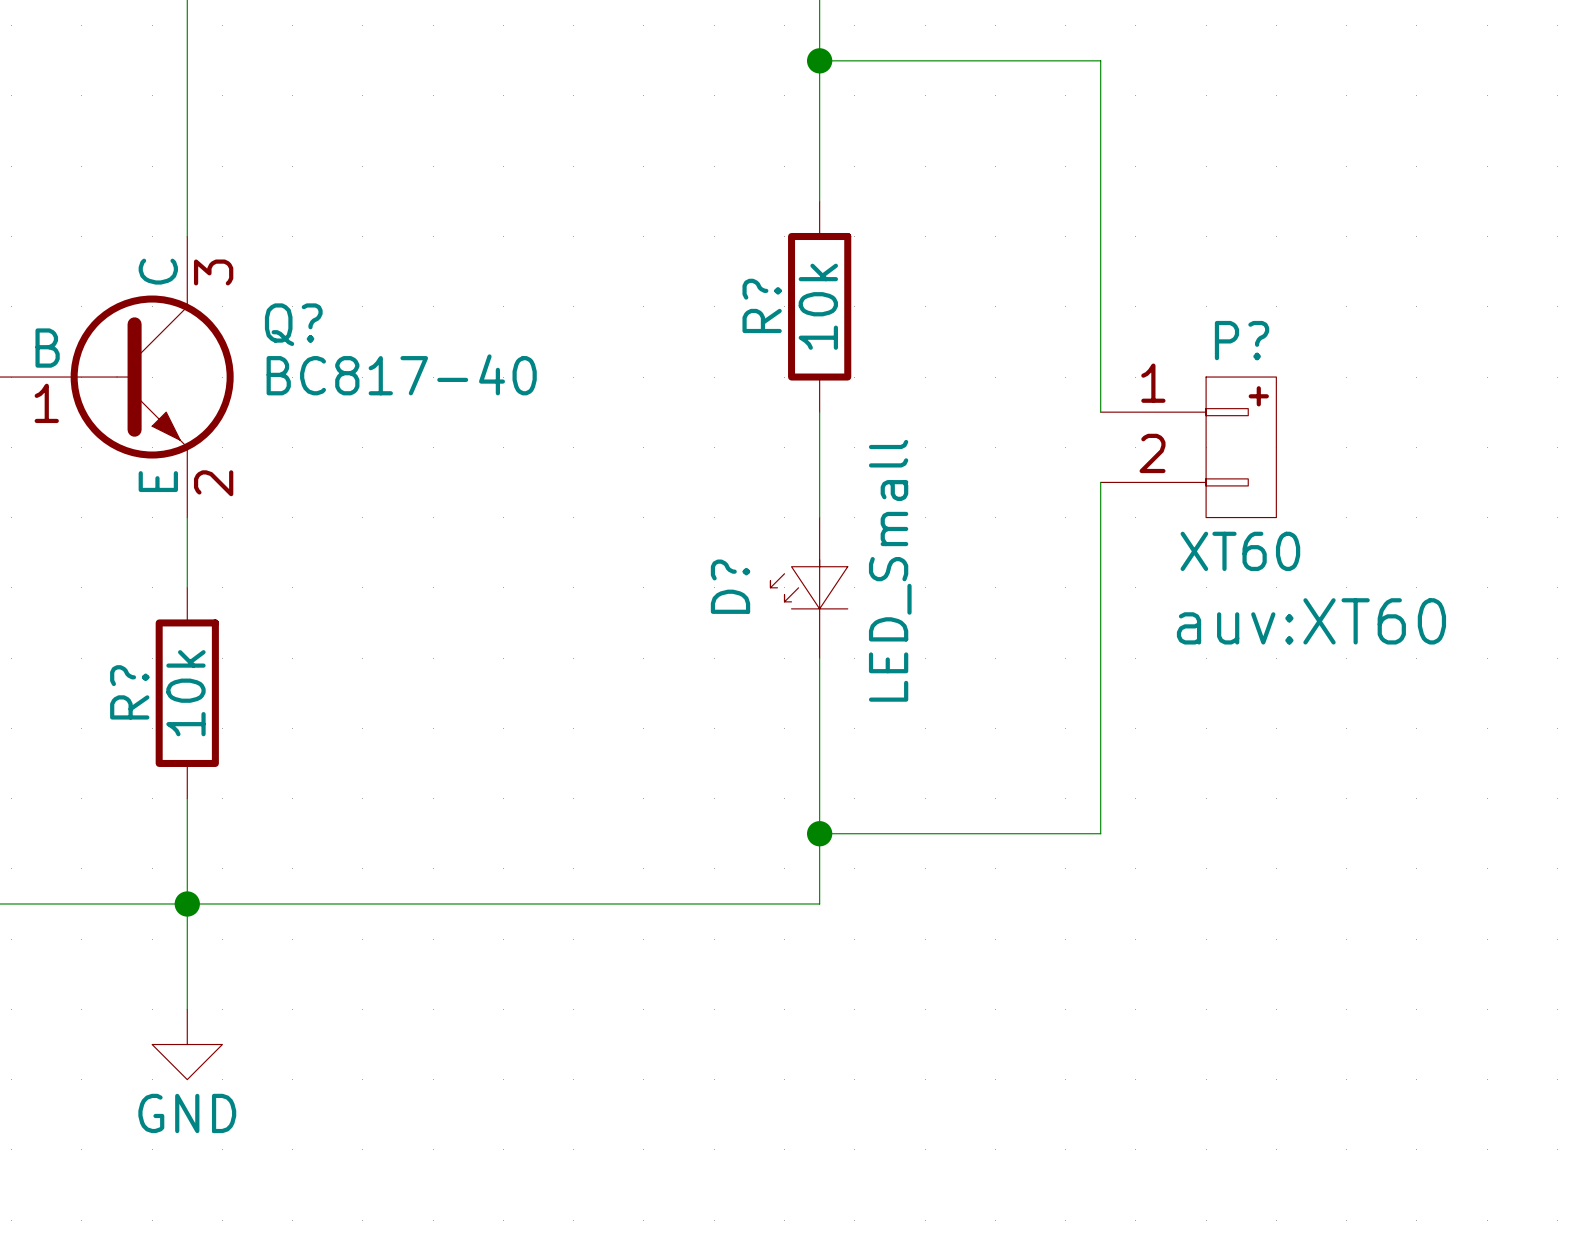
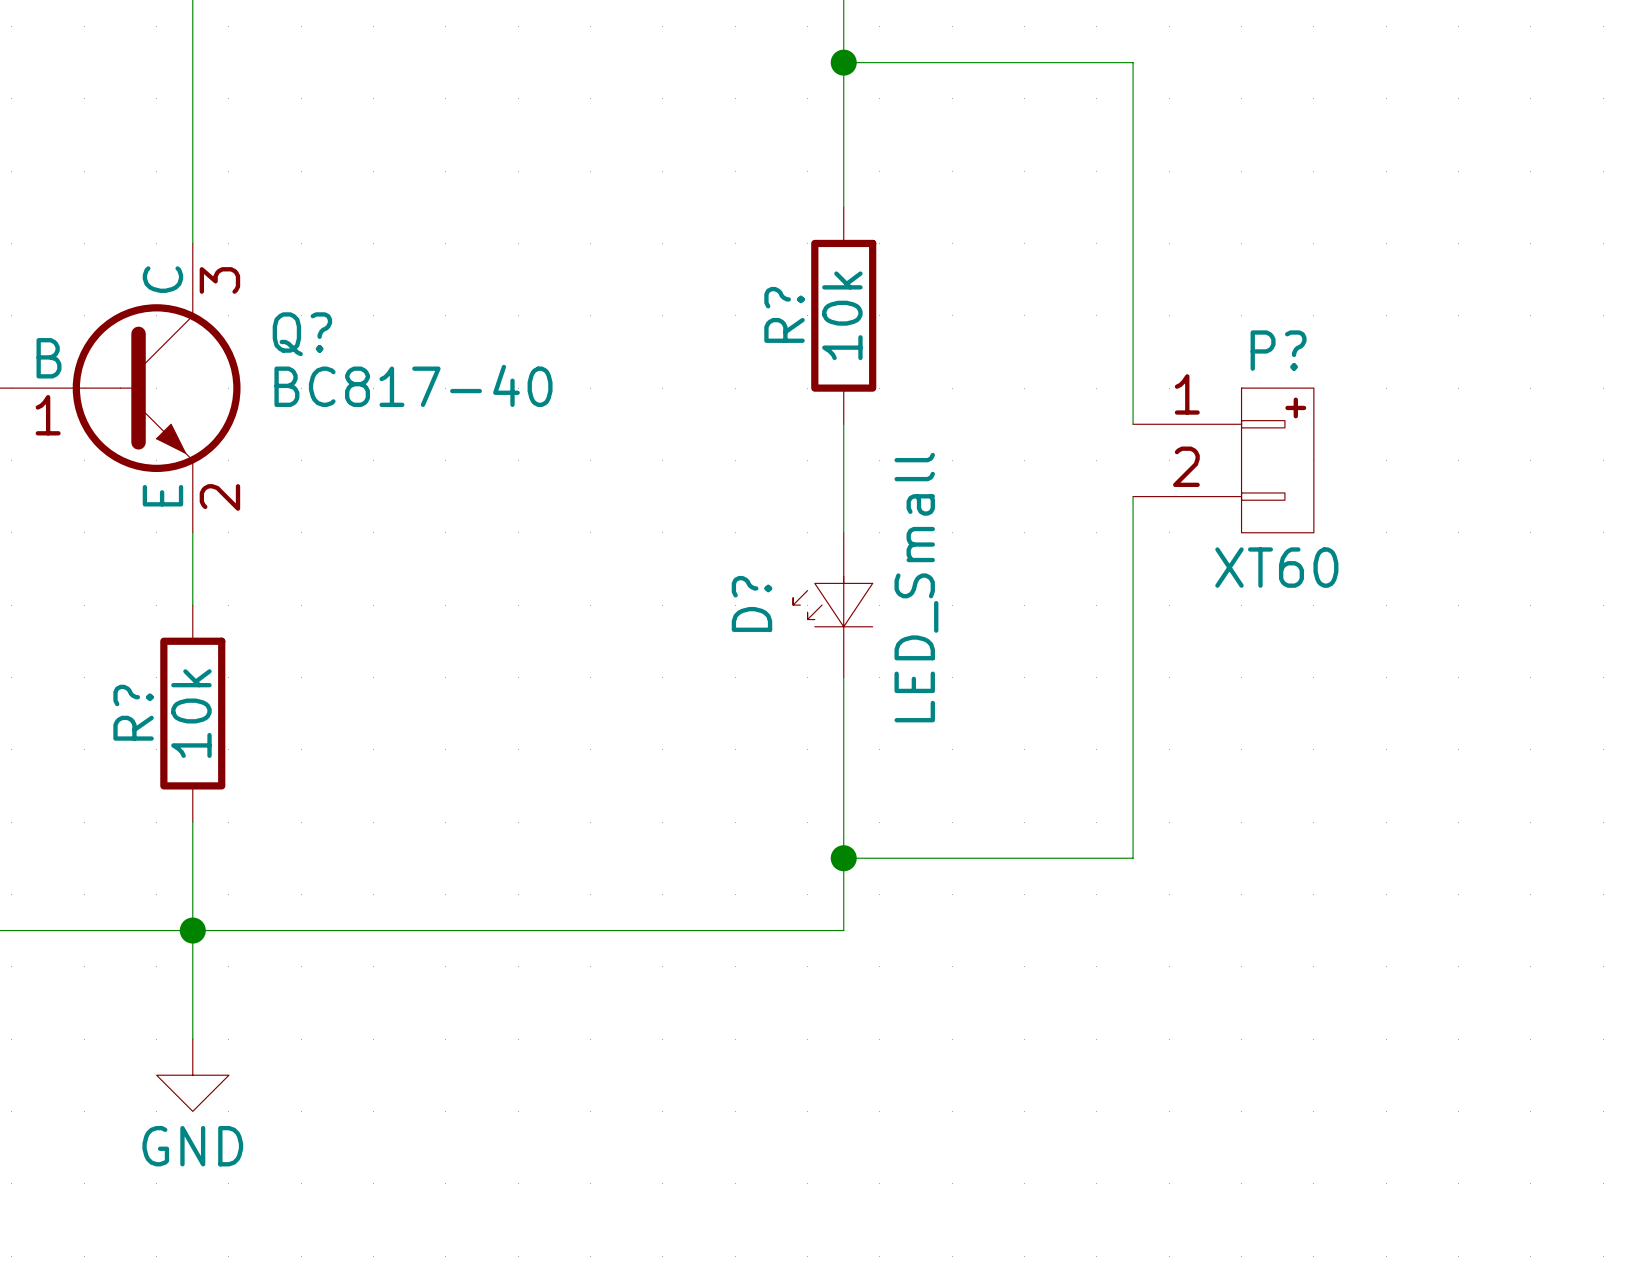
P? text: auv:XT60 (1311, 621) -> none

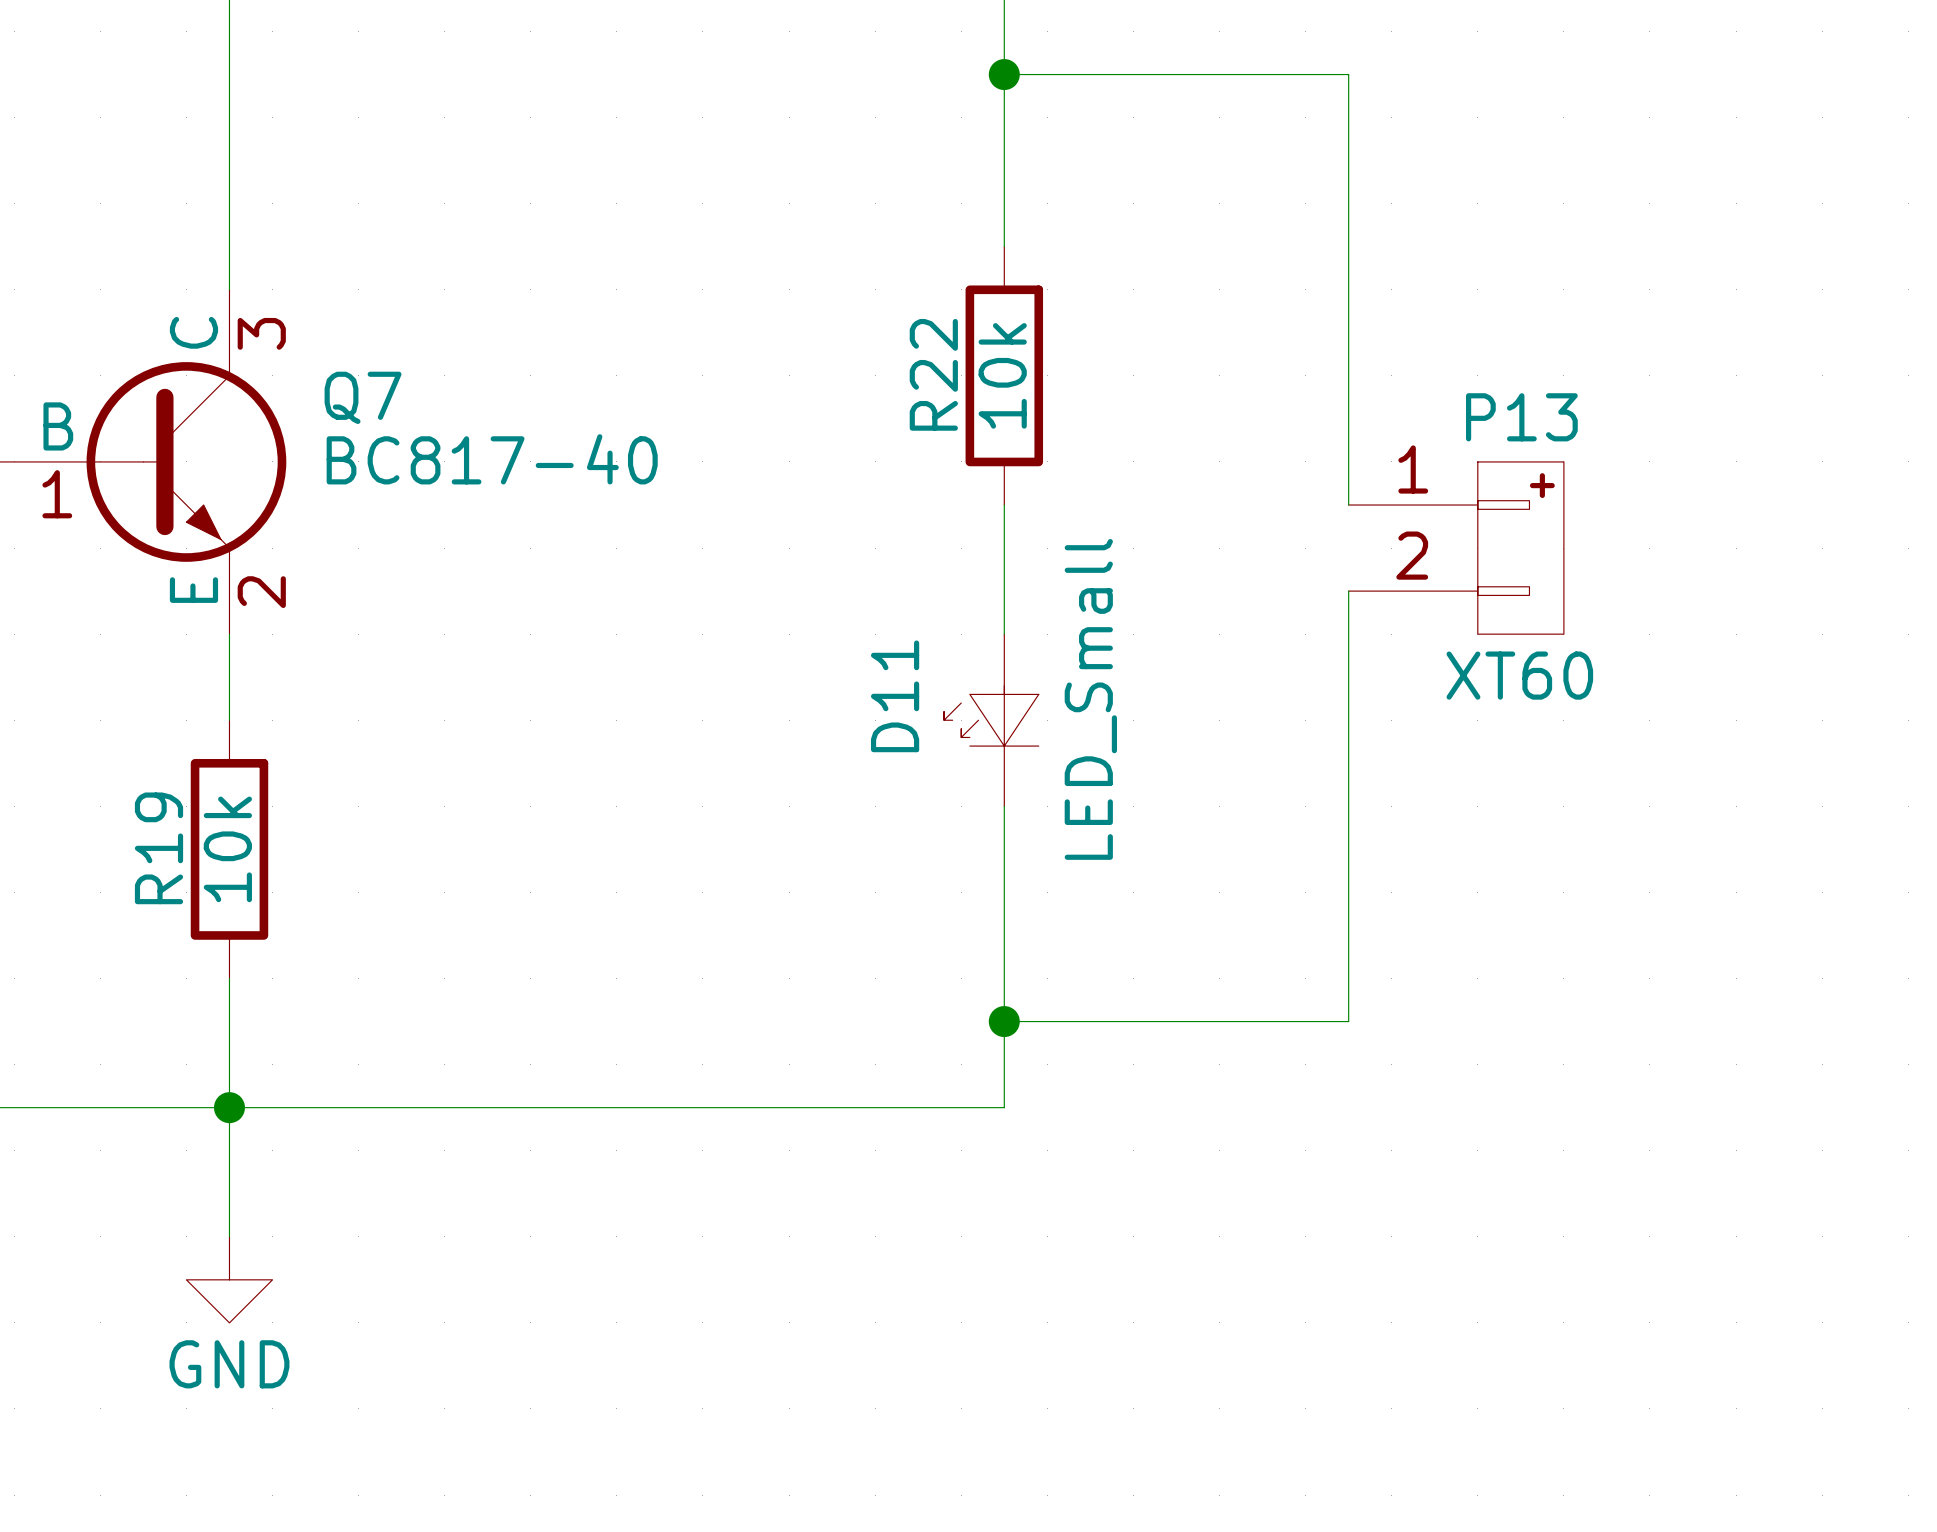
R? name: R? (784, 314) -> R22 (933, 374)
Q? name: Q? (302, 334) -> Q7 (363, 397)
P? name: P? (1278, 350) -> P13 (1521, 417)
D? name: D? (751, 603) -> D11 (895, 696)
R? name: R? (133, 712) -> R19 (158, 848)

